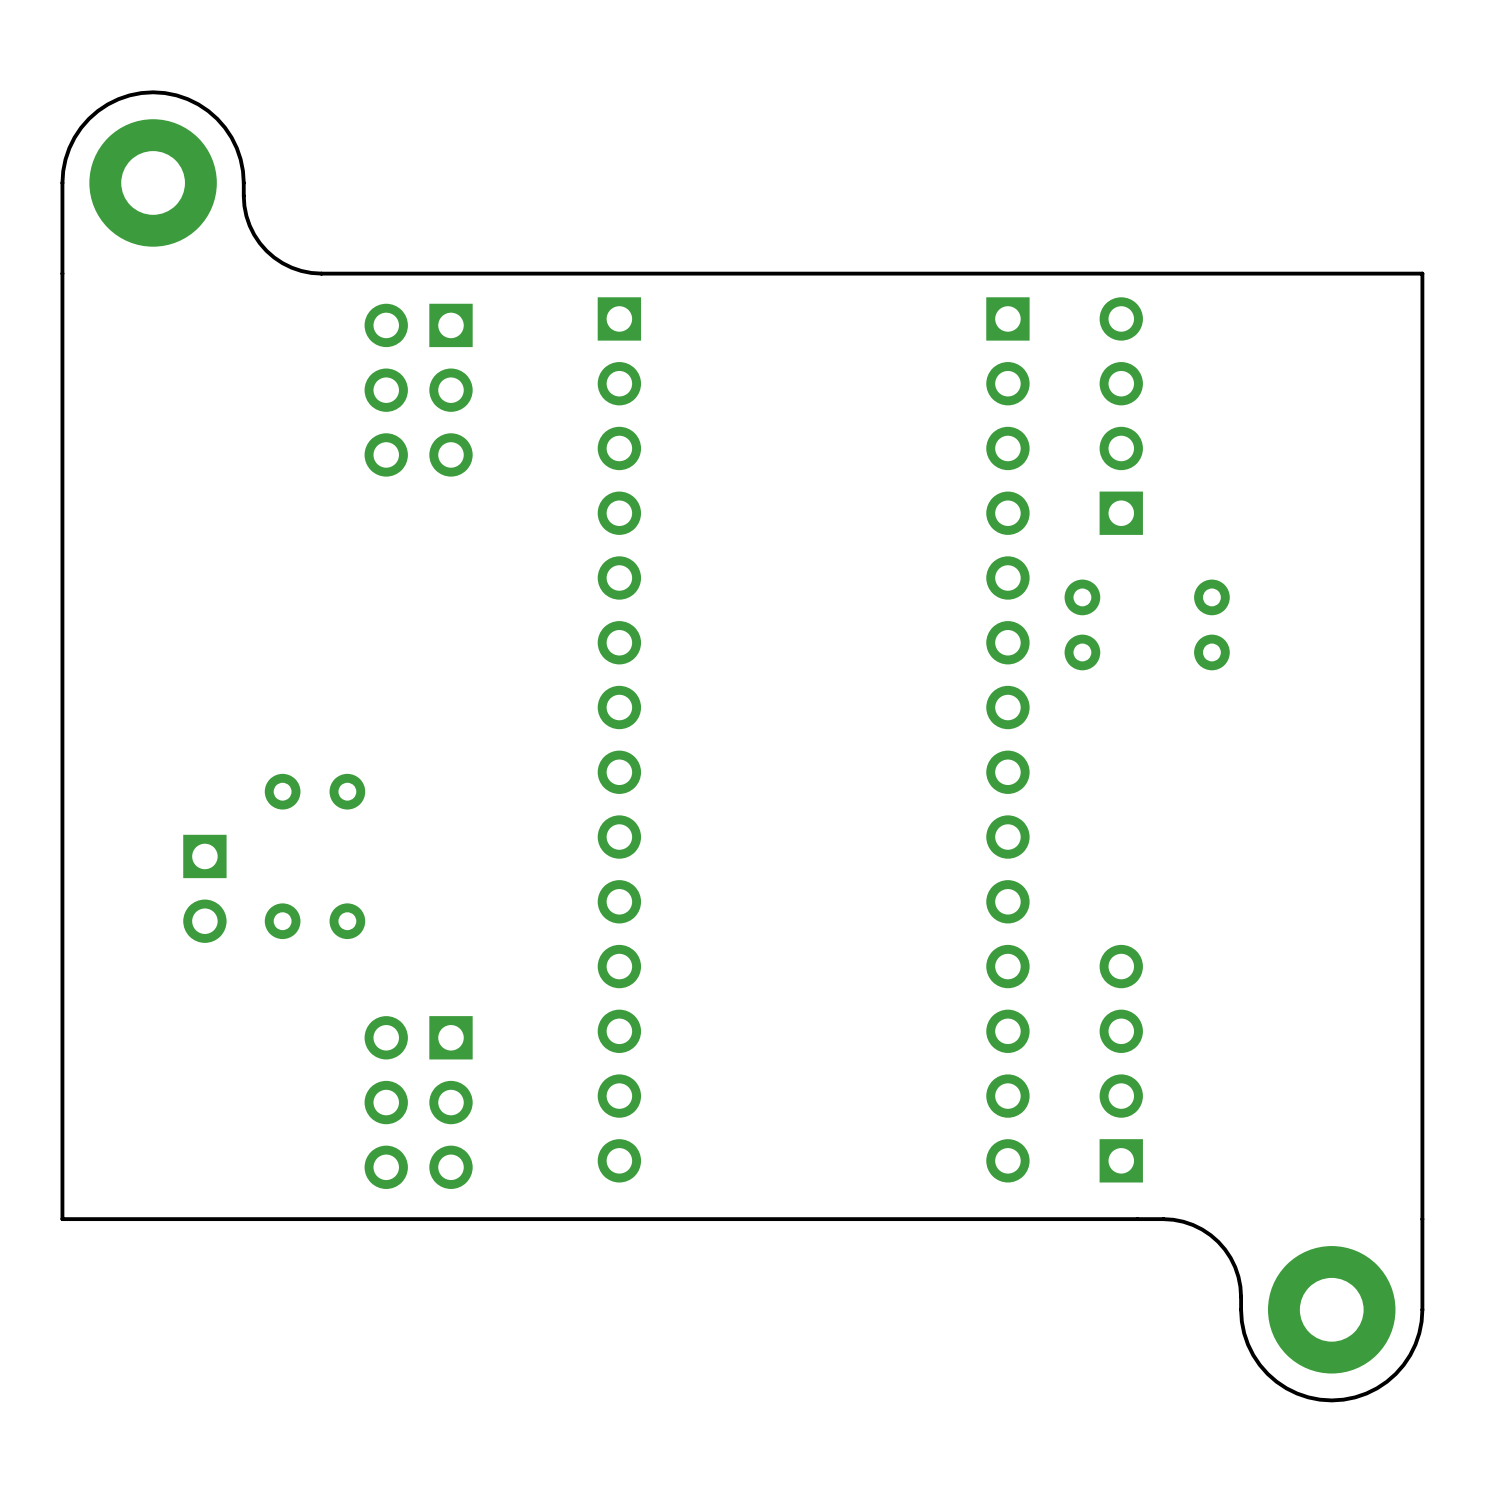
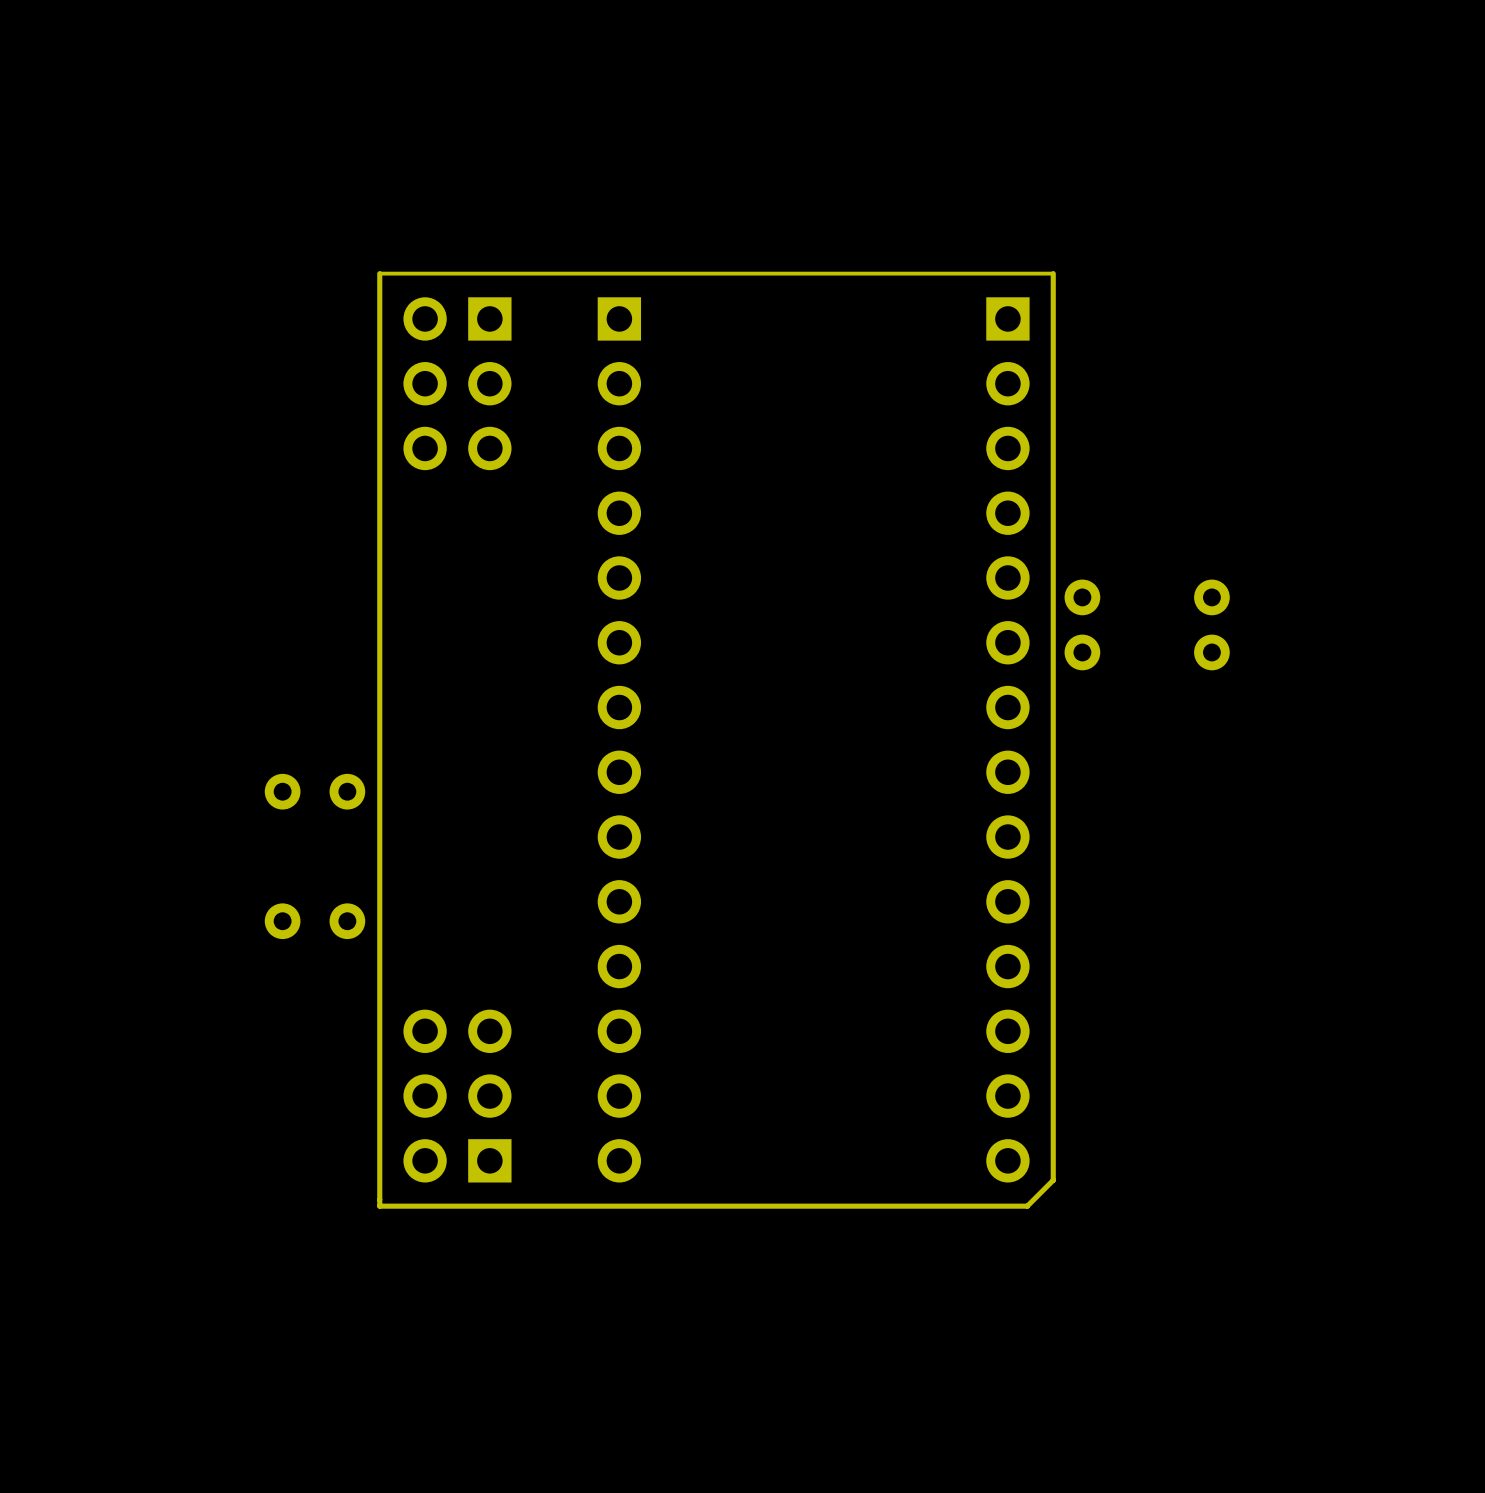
part: (153, 182) -> none
board edge: (1053, 273) (1422, 273) (1422, 1309) (1419, 1333) (1410, 1355) (1403, 1364) (1386, 1381) (1377, 1388) (1355, 1397) (1331, 1400) (1308, 1397) (1286, 1388) (1267, 1373) (1253, 1355) (1244, 1333) (1240, 1286) (1230, 1257) (1218, 1241) (1202, 1229) (1173, 1219) (62, 1219) (62, 182) (63, 171) (69, 148) (81, 127) (88, 118) (97, 111) (118, 99) (141, 93) (153, 92) (164, 93) (187, 99) (208, 111) (225, 127) (231, 137) (236, 148) (242, 171) (246, 216) (254, 234) (266, 250) (282, 263) (301, 270) (321, 273) (379, 273) -> (1053, 273) (1053, 1180) (1027, 1206) (379, 1206) (379, 273)
part position: (418, 390) -> (457, 383)
part: (1121, 416) -> none
part: (204, 888) -> none
part: (1121, 1063) -> none
part: none -> (457, 1096)
part: (418, 1102) -> none
part: (1331, 1309) -> none

